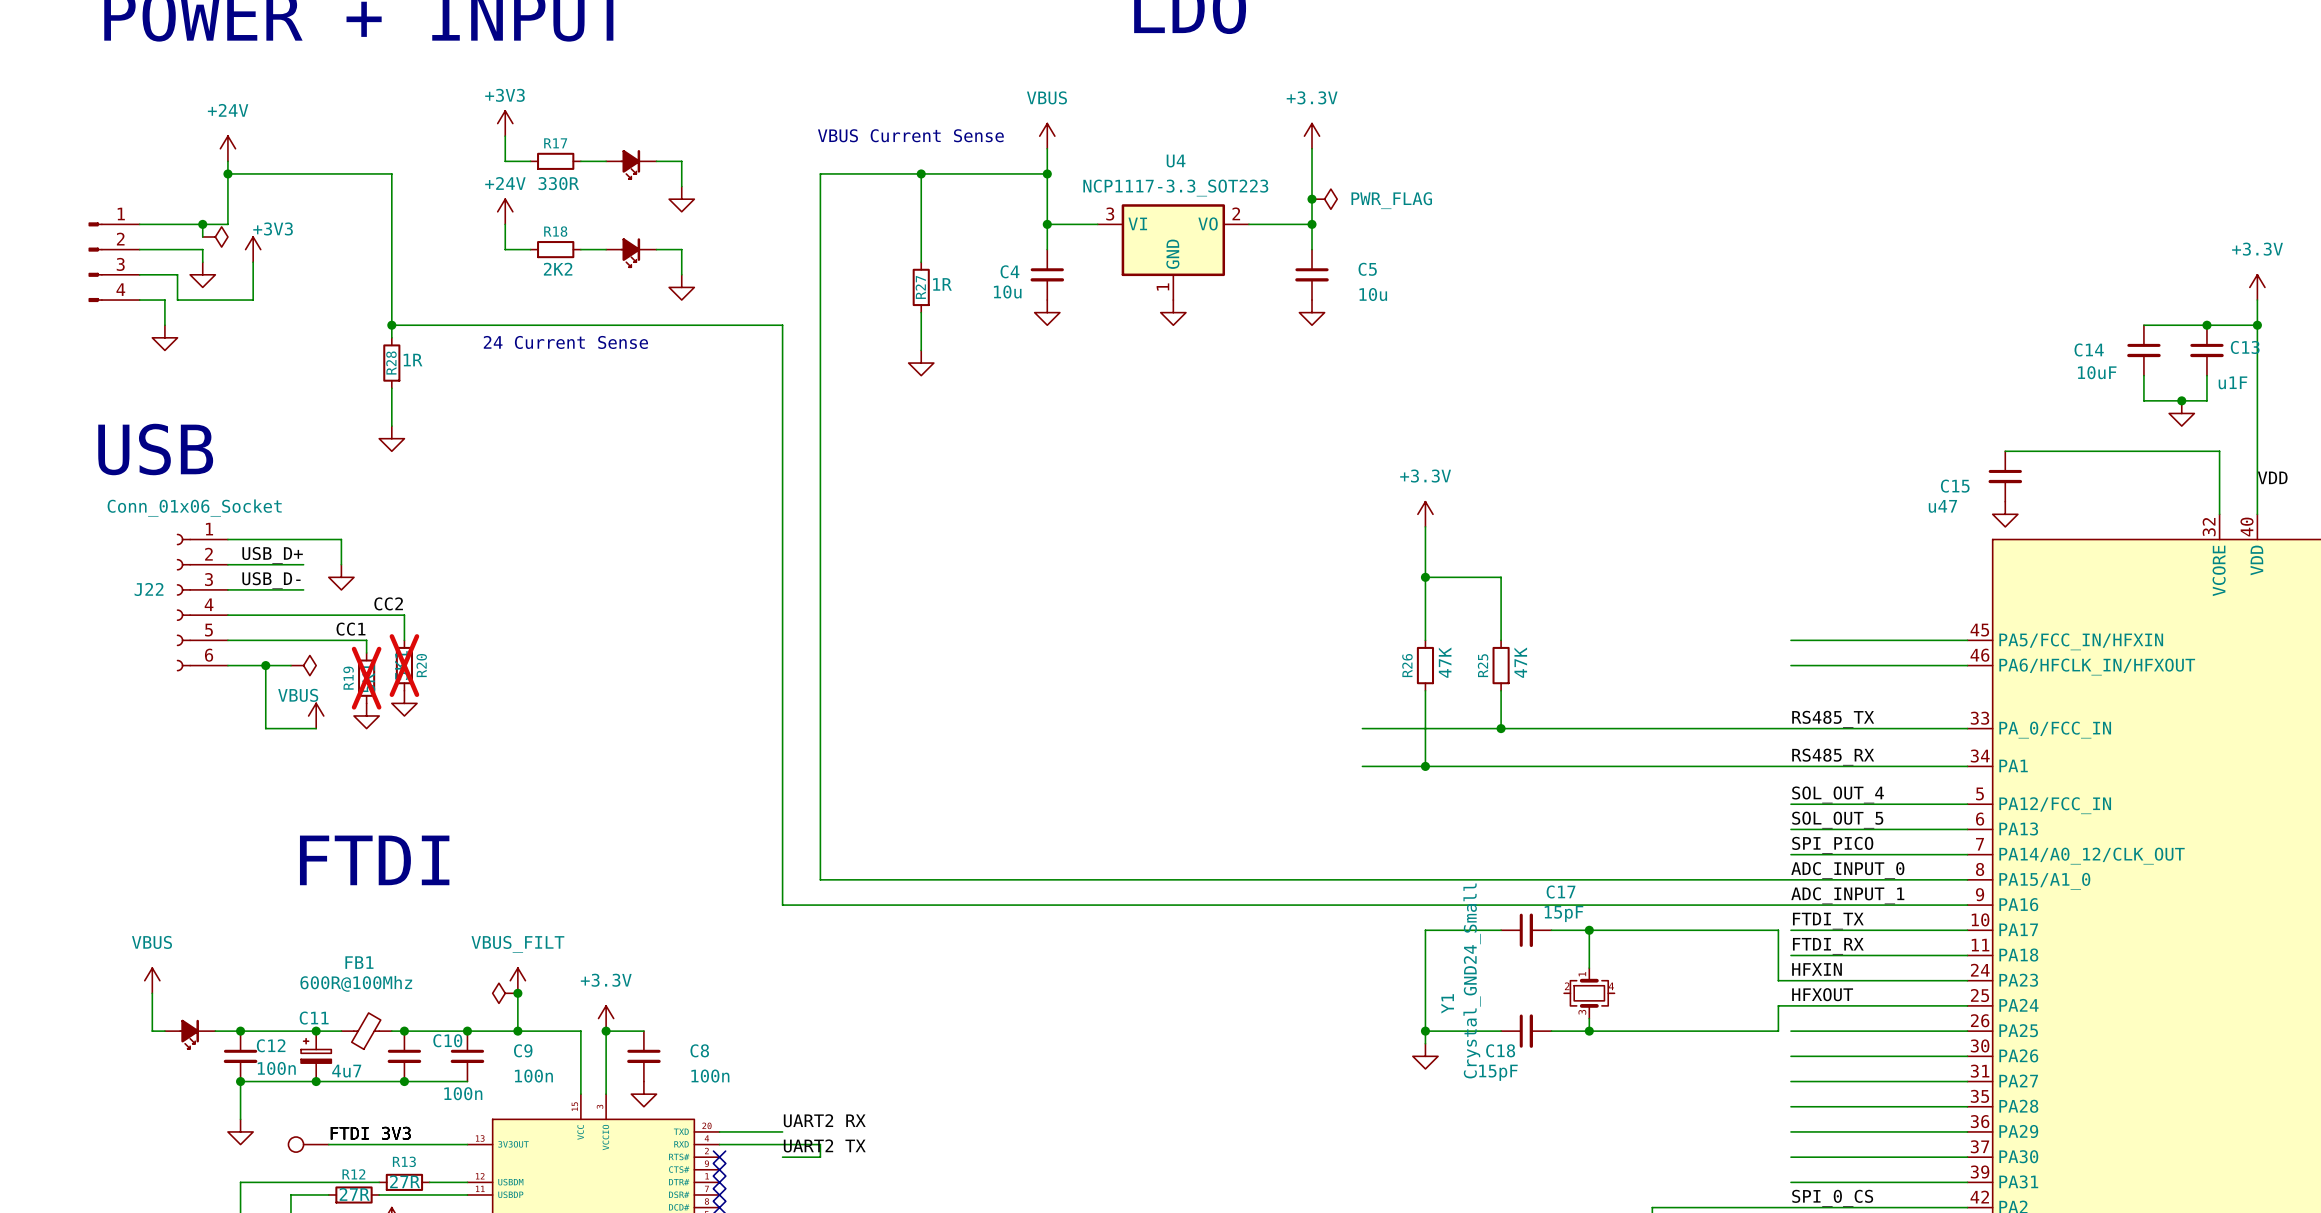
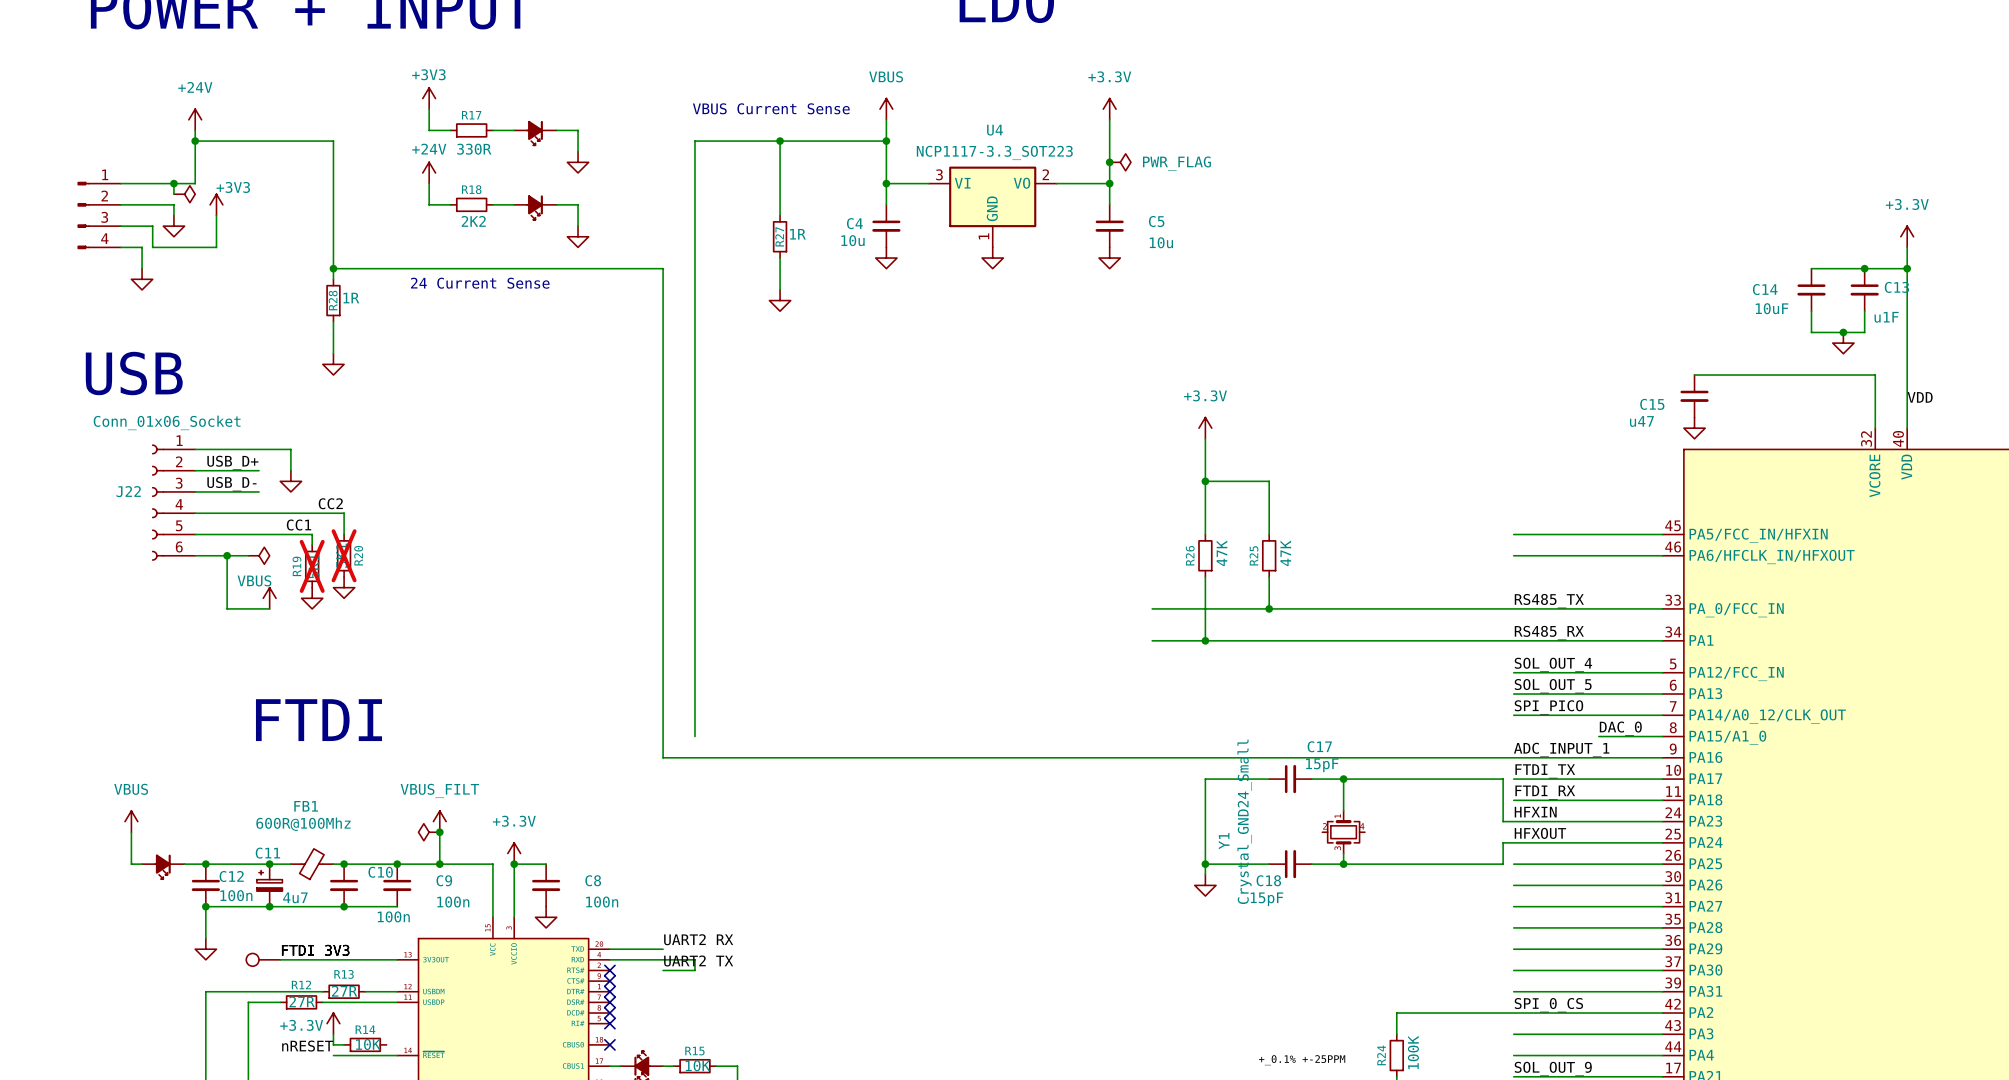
label: ADC_INPUT_0 (1847, 870) -> none
label: none -> DAC_0 (1620, 728)
wire: (820, 879) (1891, 879) -> none

